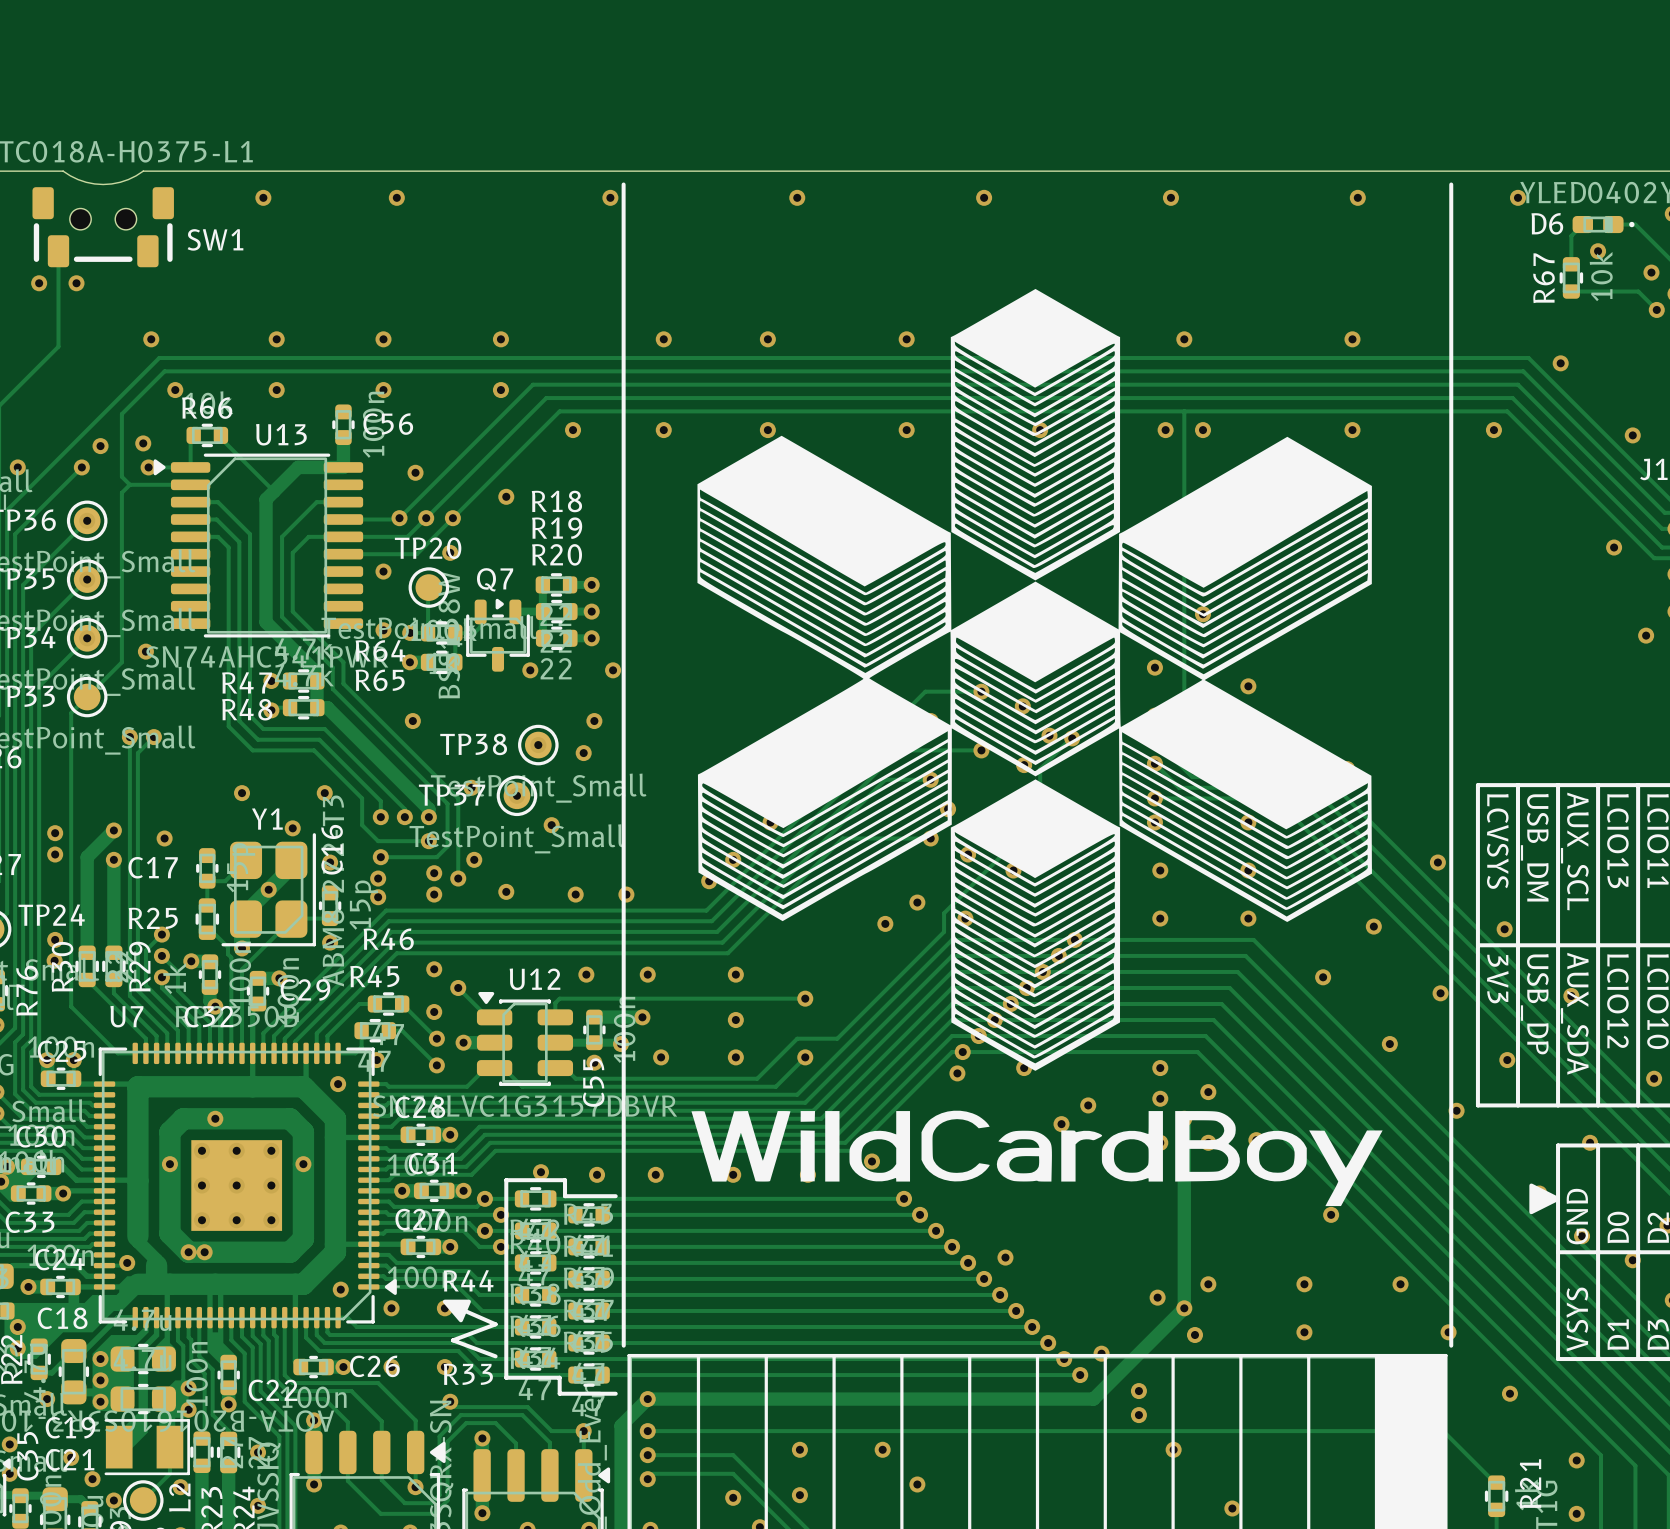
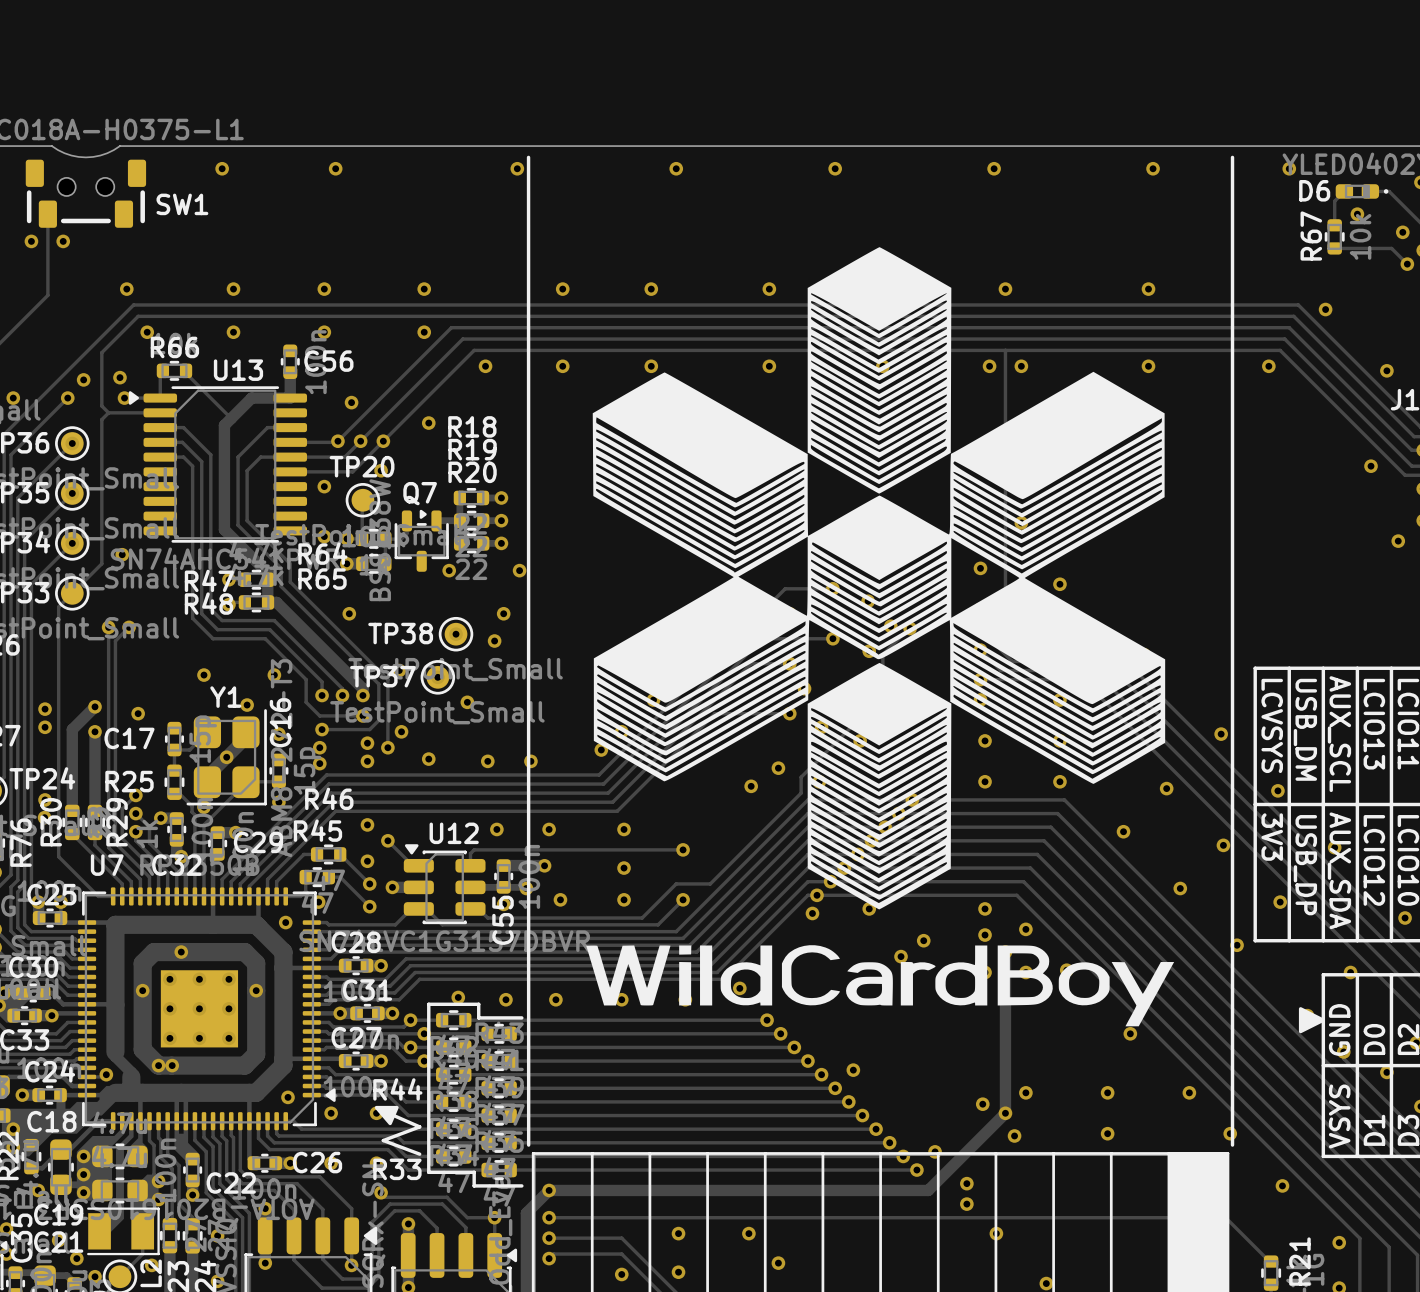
drawing shape: [697, 288, 1372, 1071] -> [592, 247, 1166, 910]

